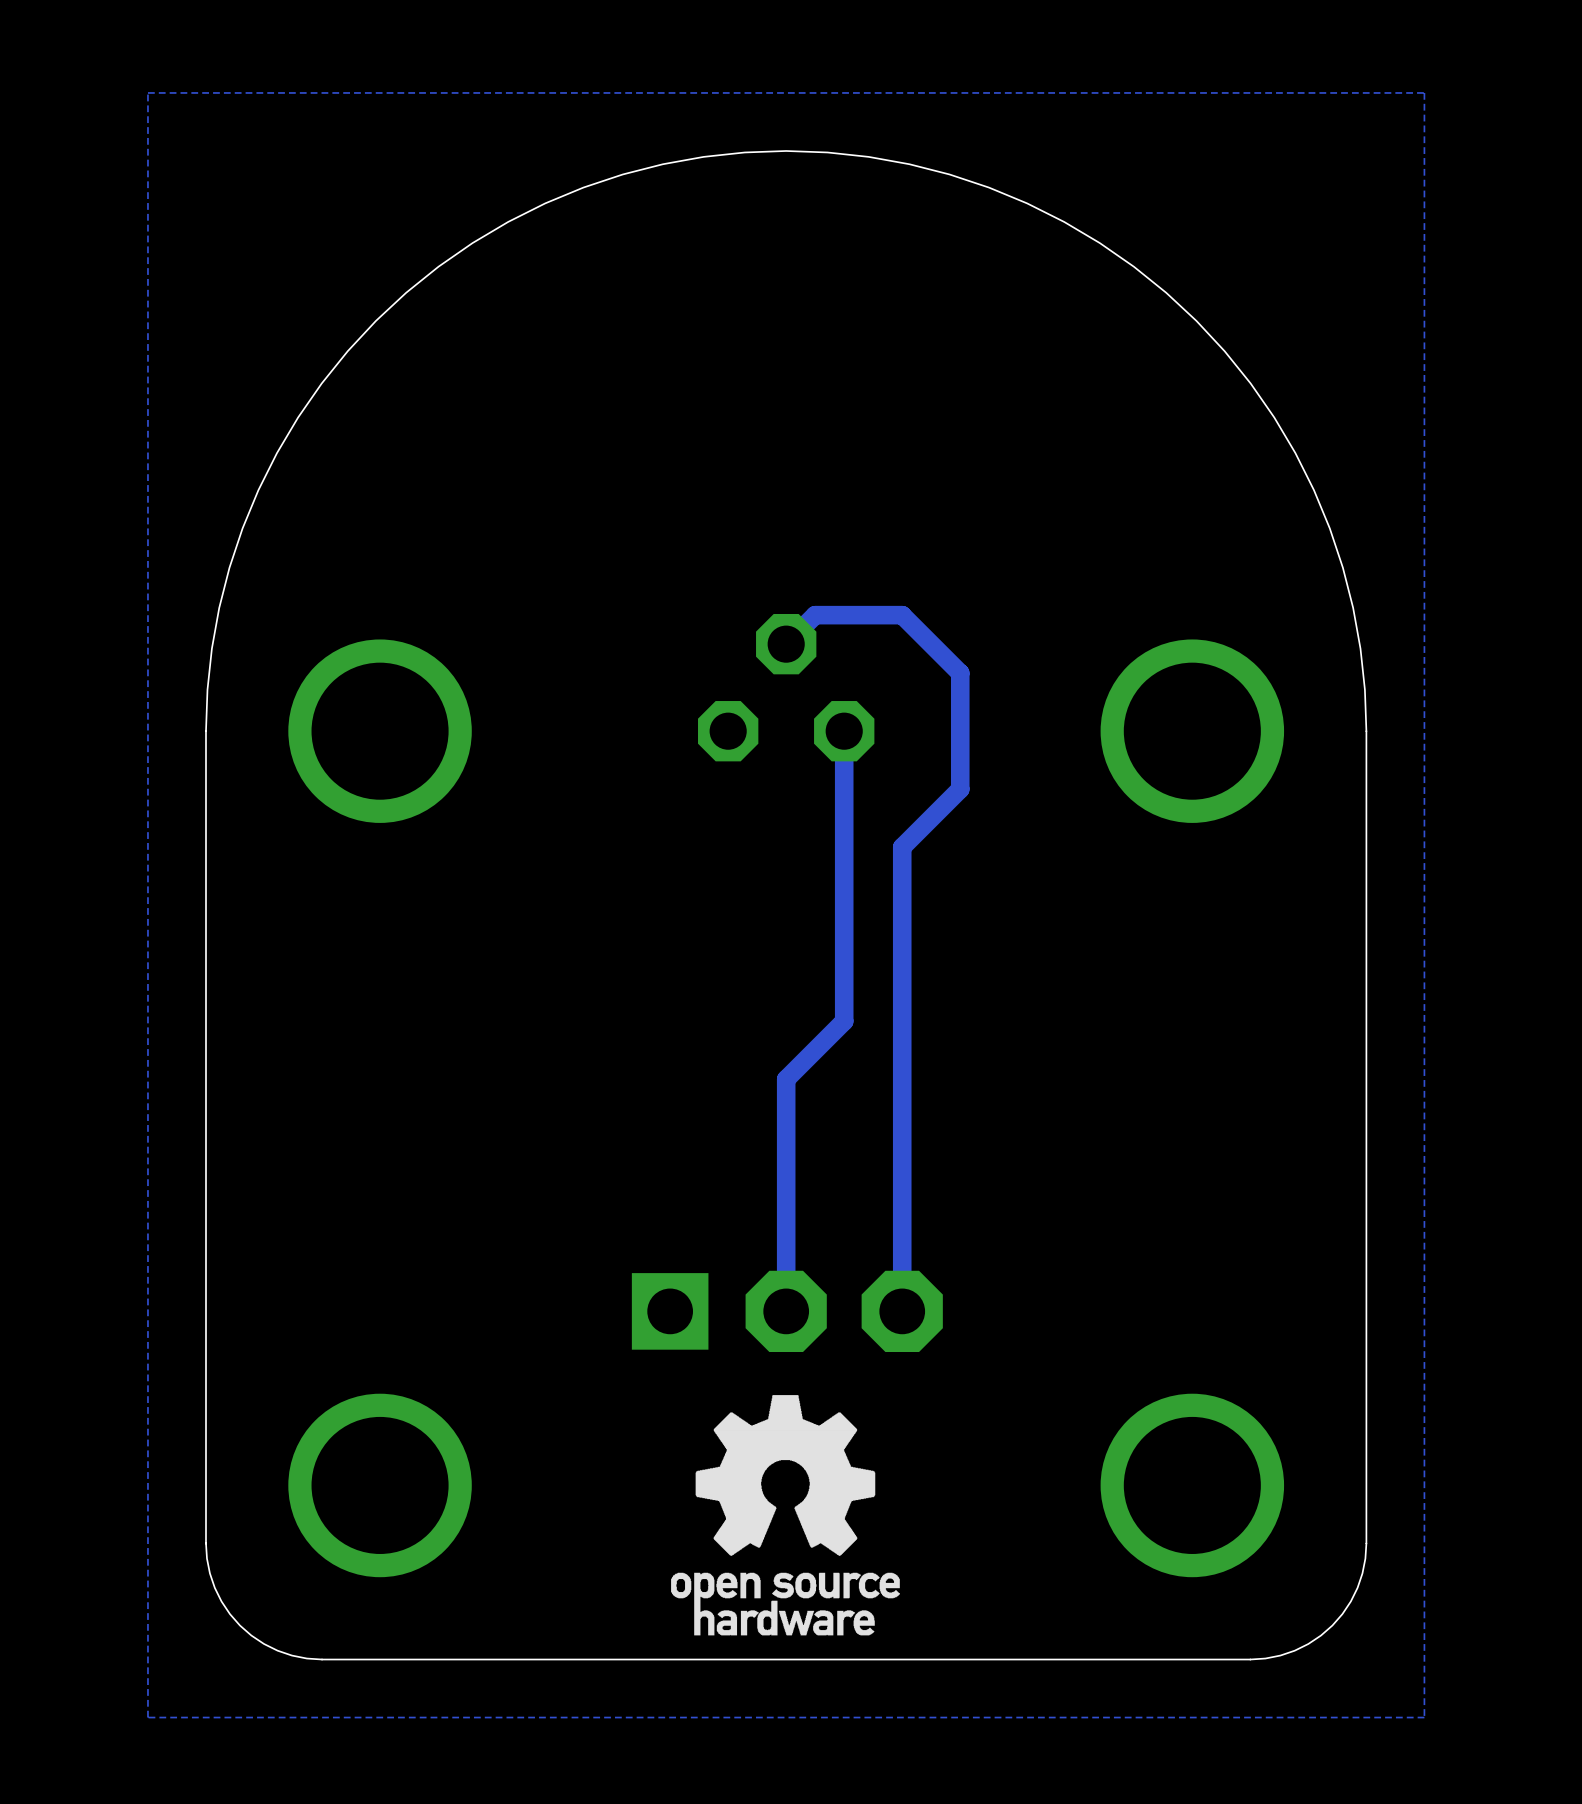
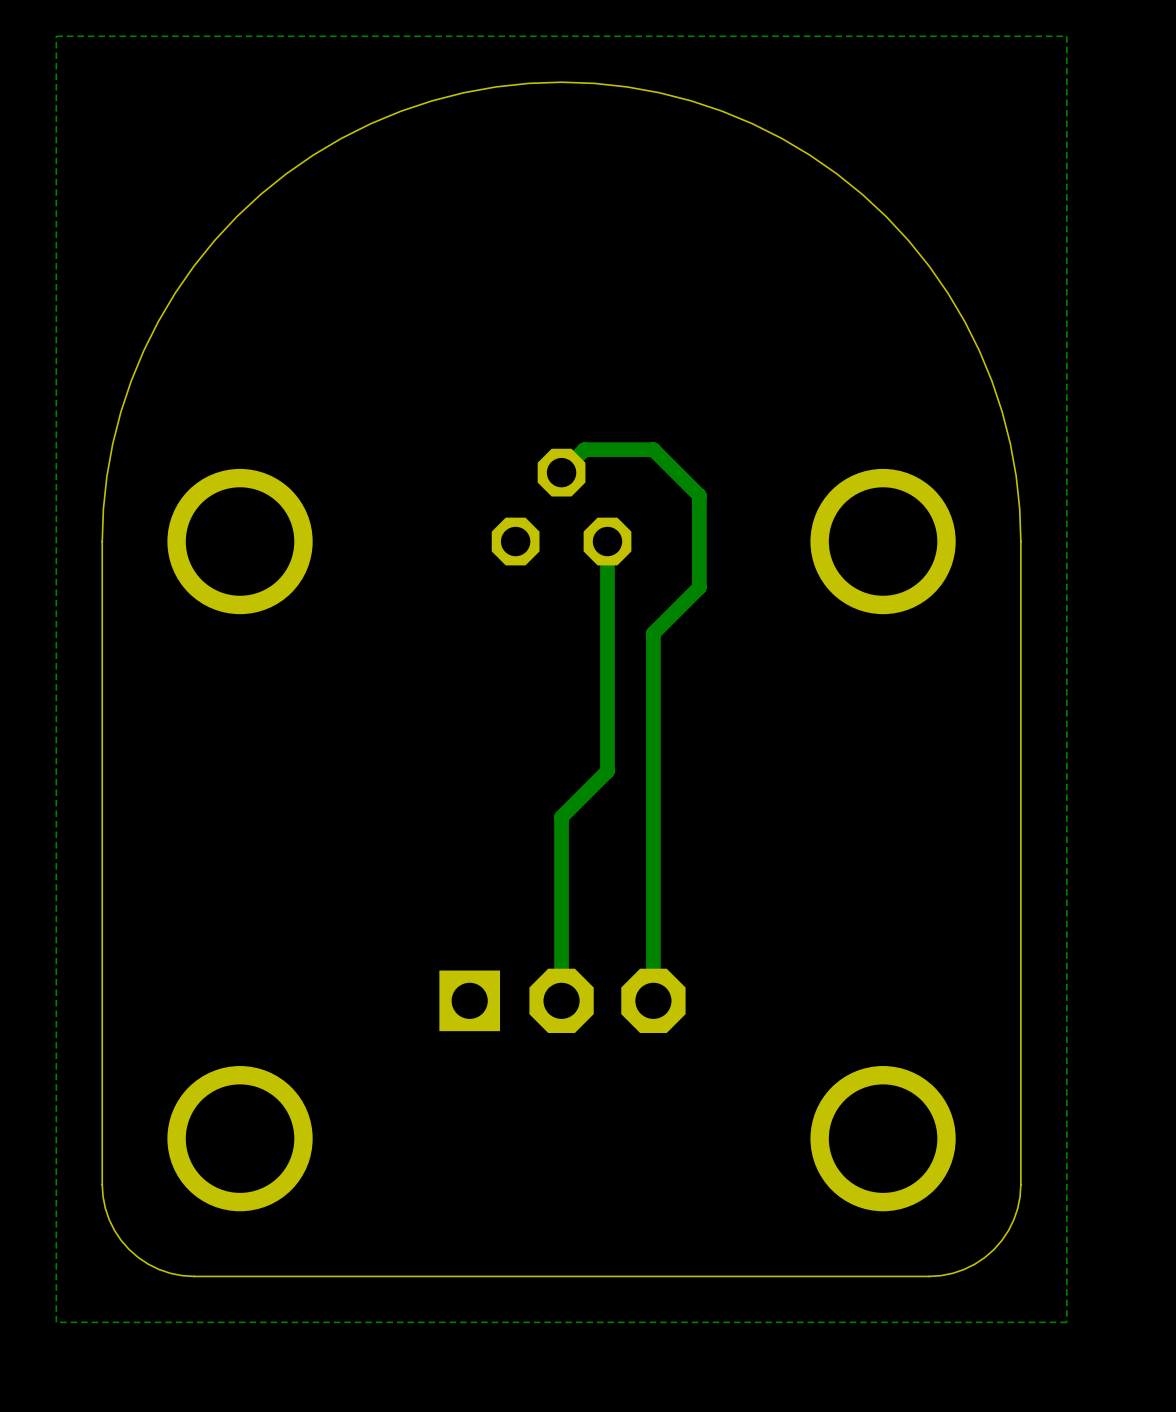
drawing: [671, 1395, 900, 1636] -> none

